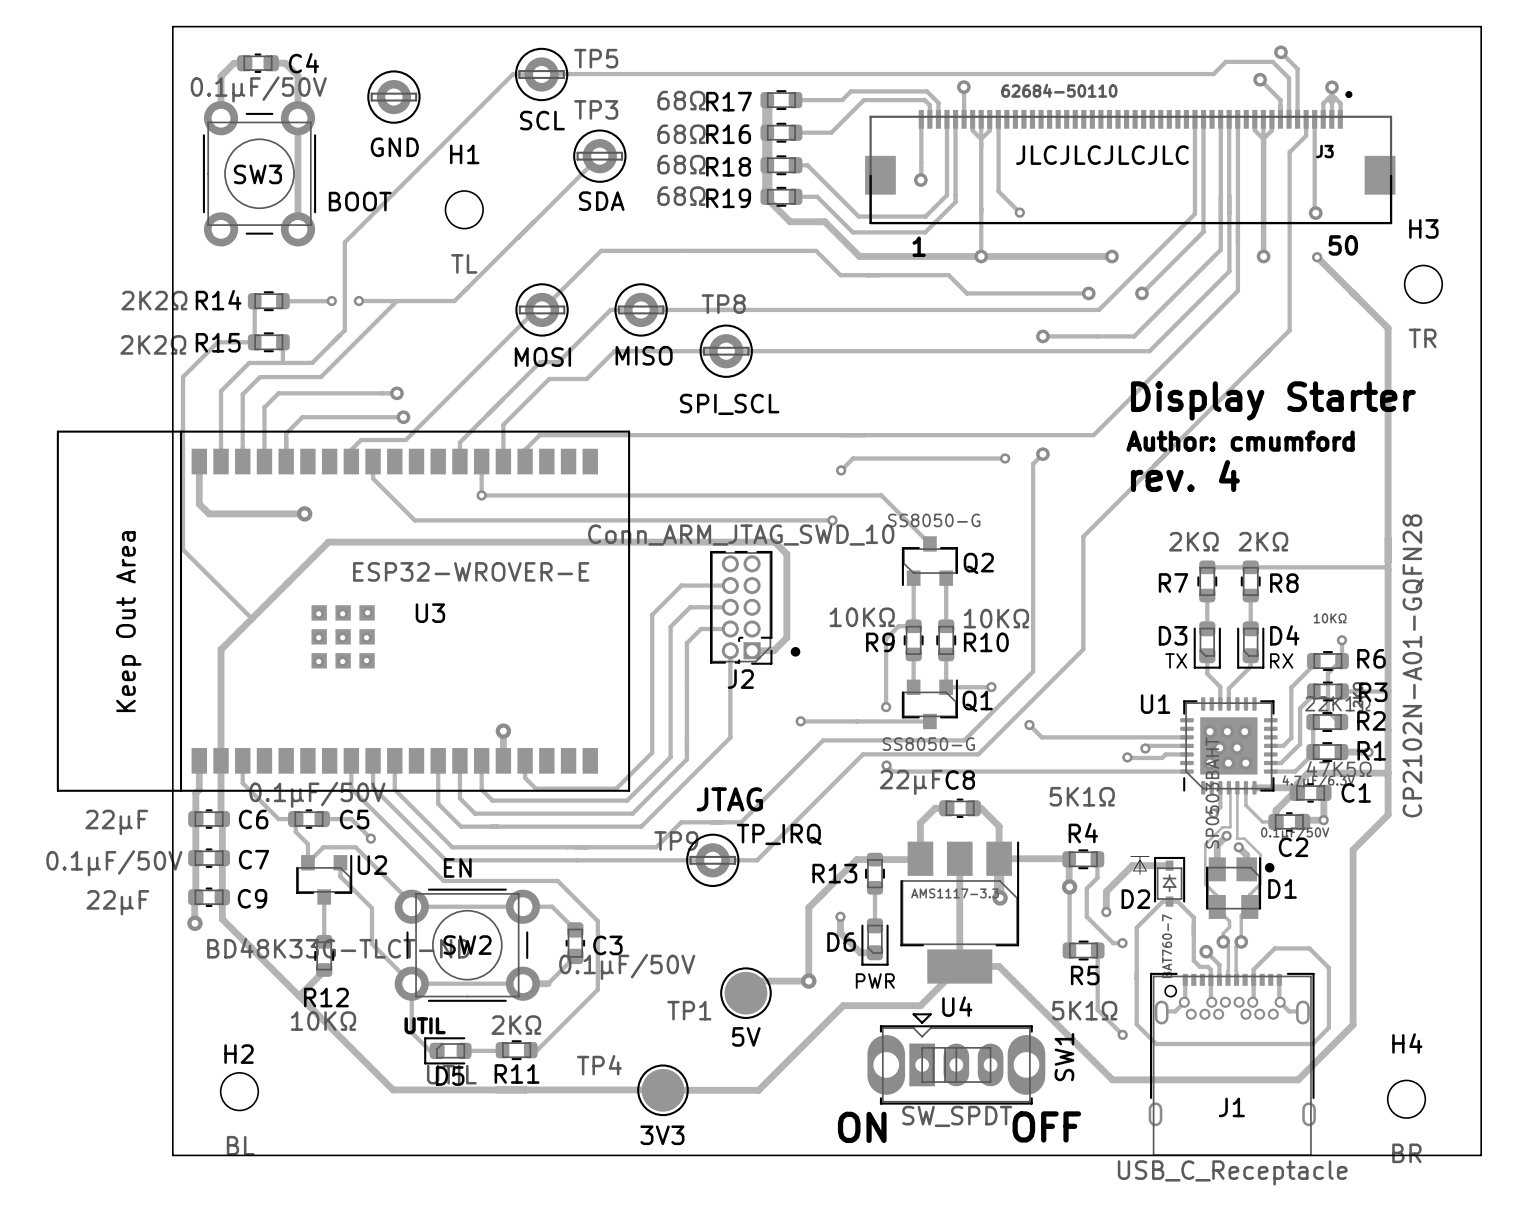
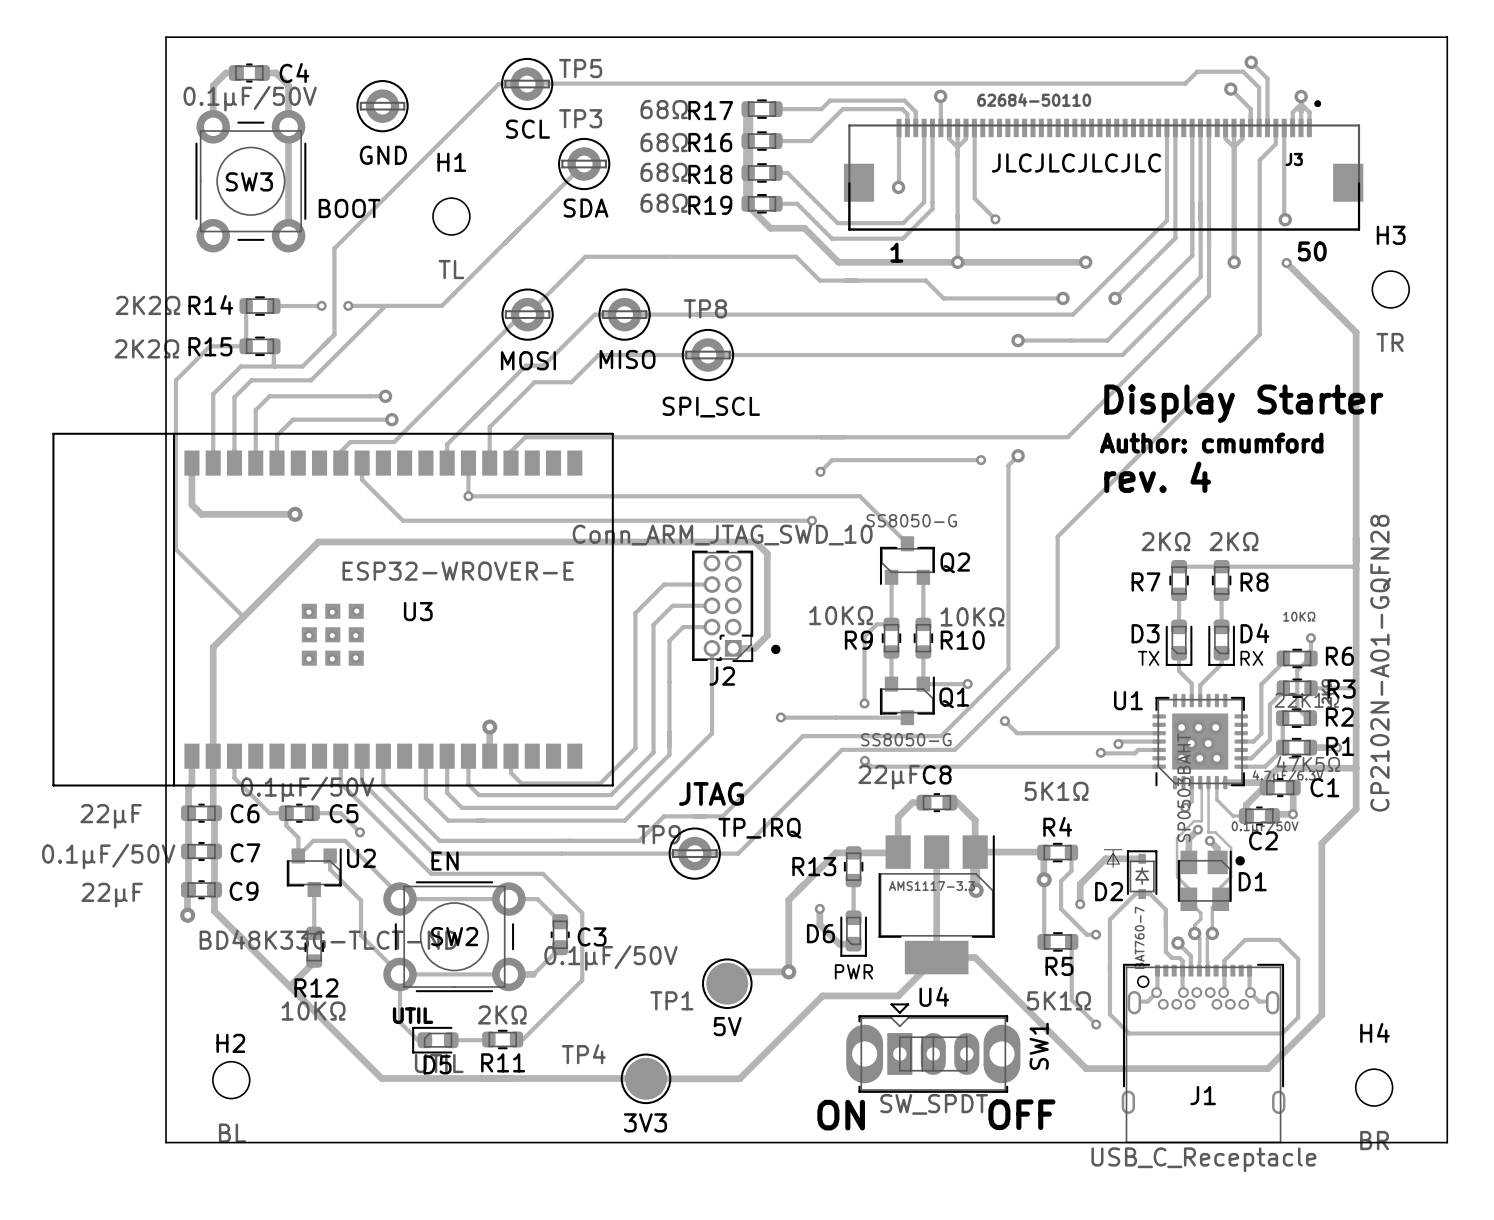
U3 text: Keep Out Area (128, 621) -> none

